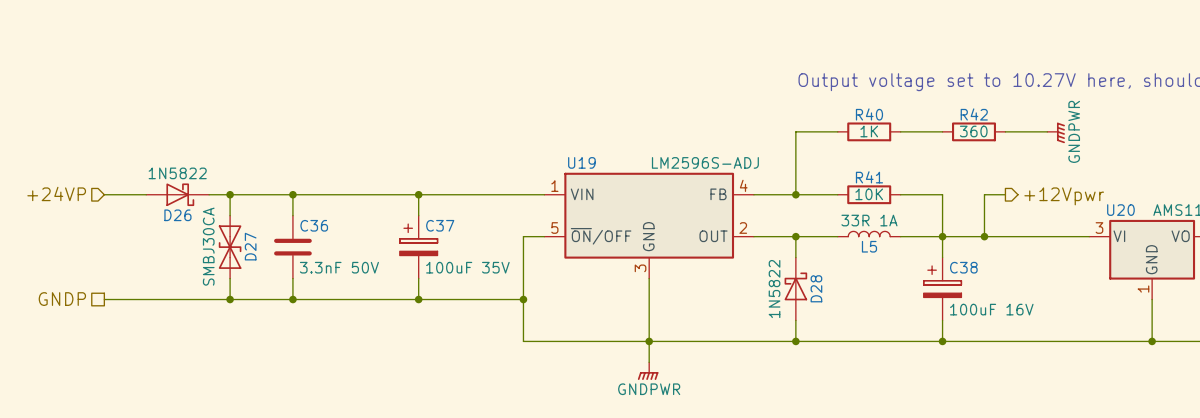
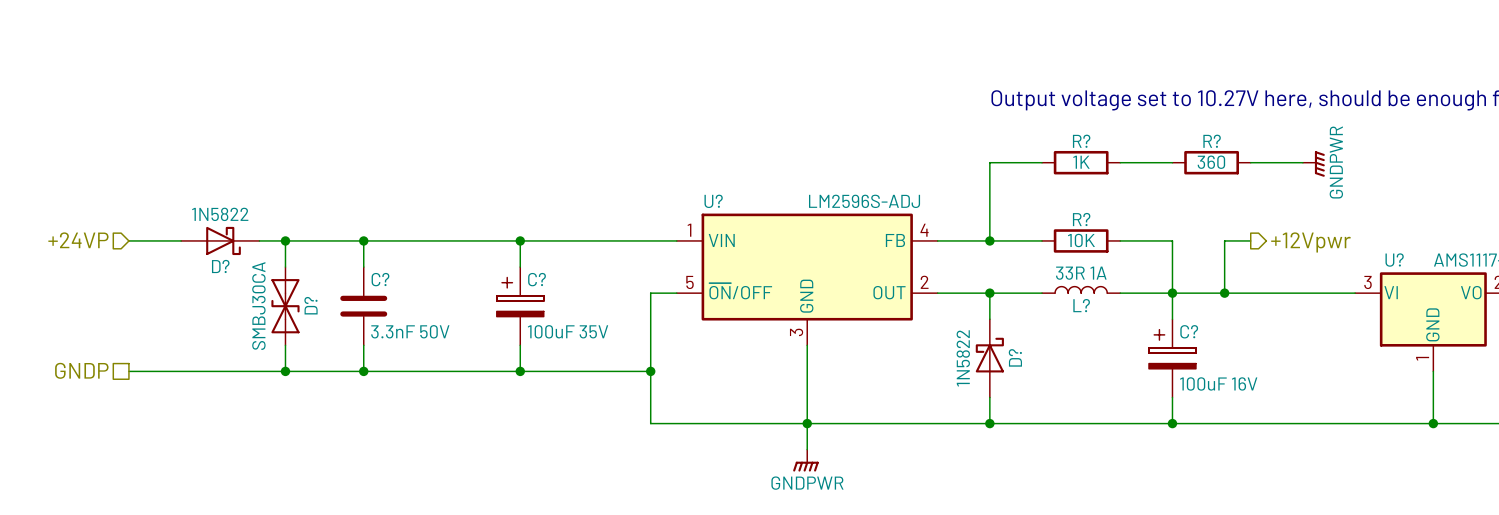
R40 name: R40 (869, 114) -> R? (1081, 141)
R42 name: R42 (974, 114) -> R? (1212, 141)
U19 name: U19 (581, 162) -> U? (713, 201)
R41 name: R41 (869, 177) -> R? (1081, 219)
U20 name: U20 (1120, 210) -> U? (1394, 260)
D26 name: D26 (177, 215) -> D? (220, 266)
C36 name: C36 (314, 225) -> C? (380, 279)
C37 name: C37 (440, 225) -> C? (537, 279)
D27 name: D27 (250, 246) -> D? (310, 305)
L5 name: L5 (869, 246) -> L? (1081, 305)
C38 name: C38 (963, 267) -> C? (1189, 331)
D28 name: D28 (816, 288) -> D? (1015, 357)

